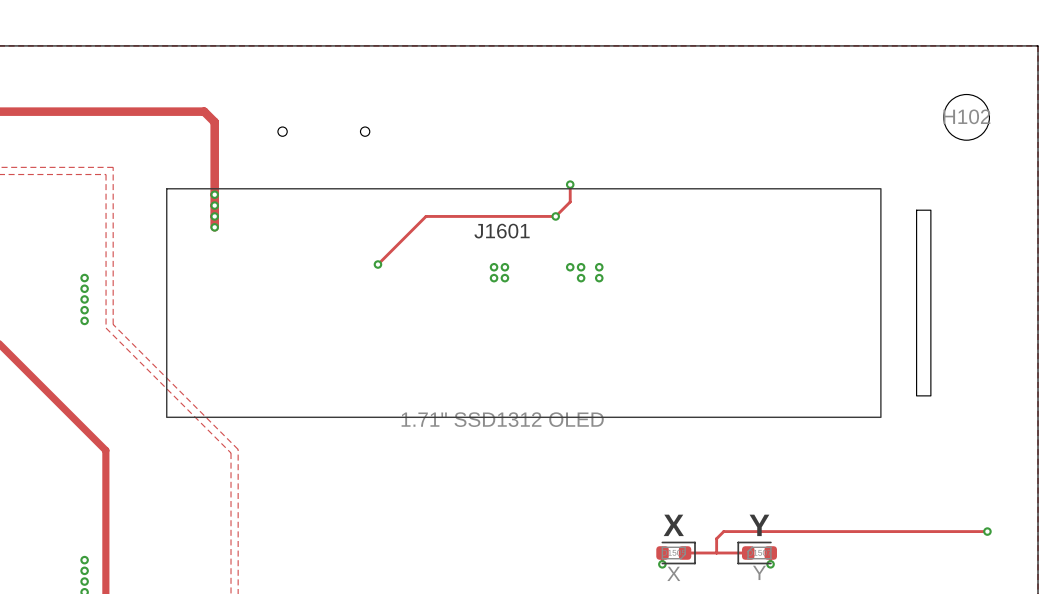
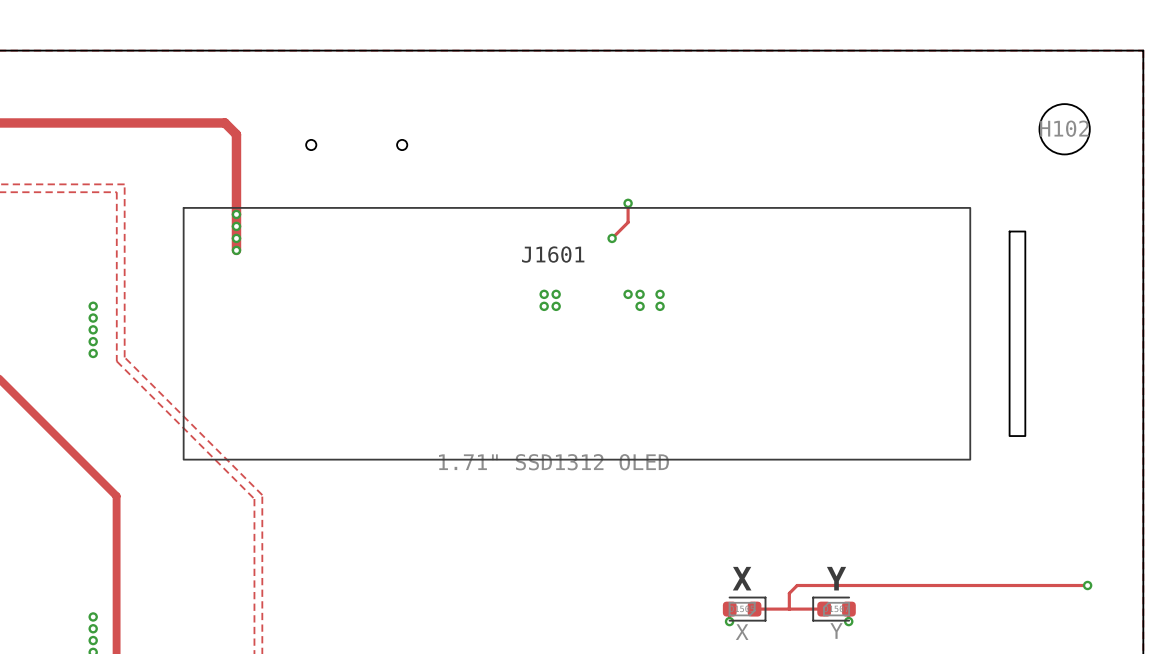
track: (555, 216) (426, 216) (377, 264) -> none
via: (377, 264) -> none

